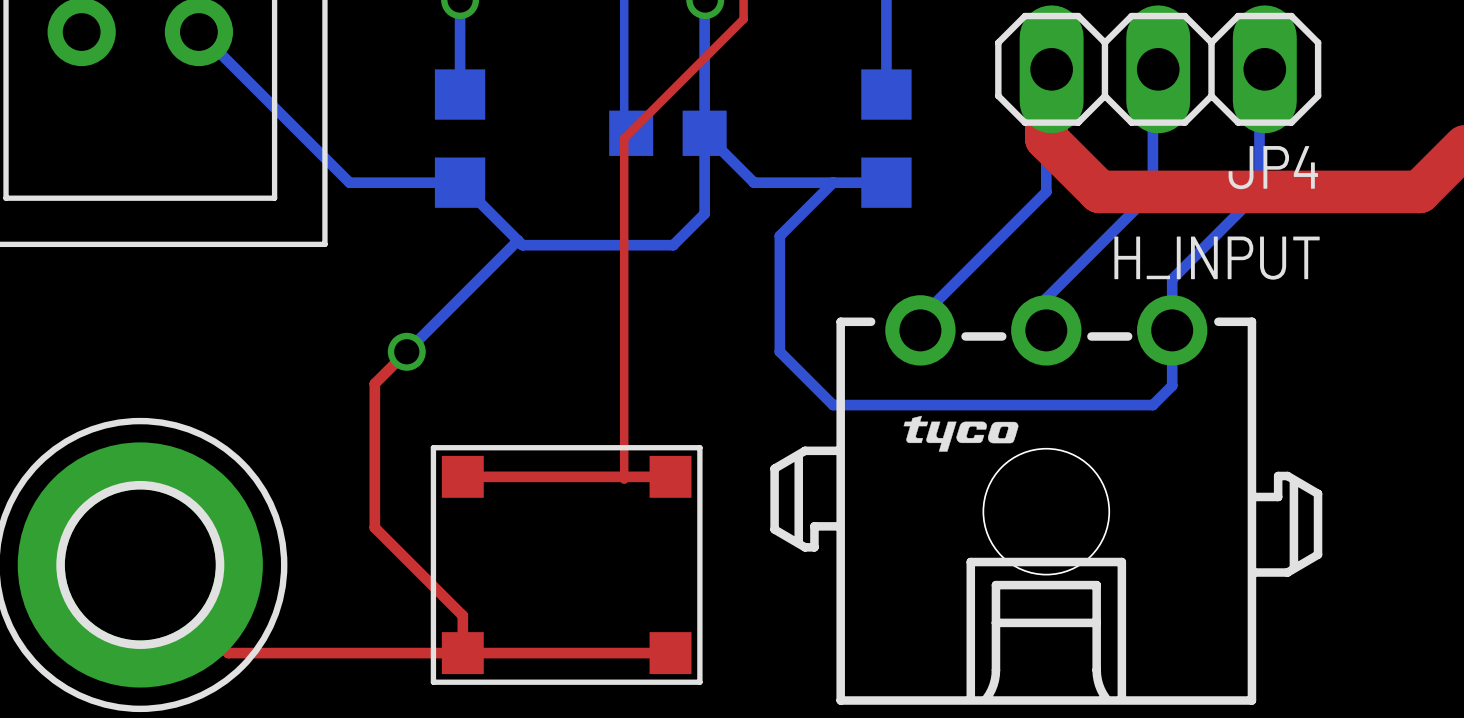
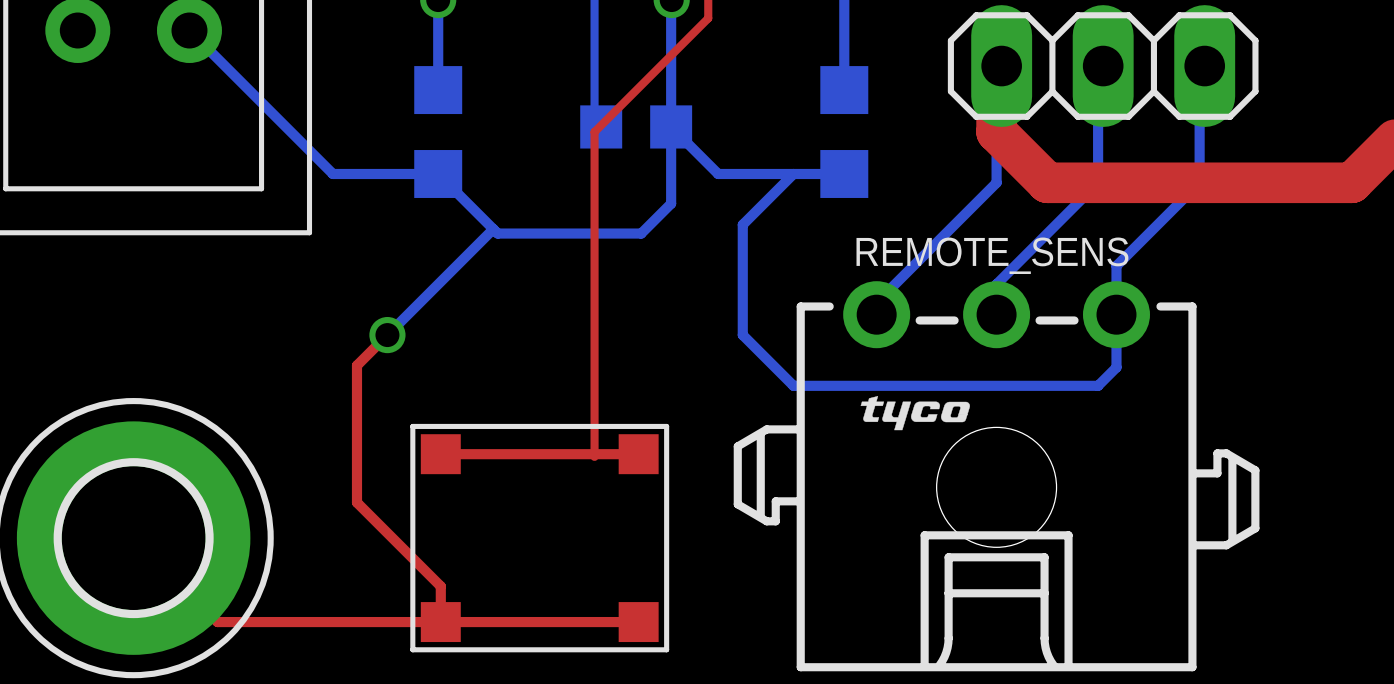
JP4 name: JP4 (1273, 167) -> none
H_INPUT name: H_INPUT (1217, 258) -> REMOTE_SENS (992, 255)

